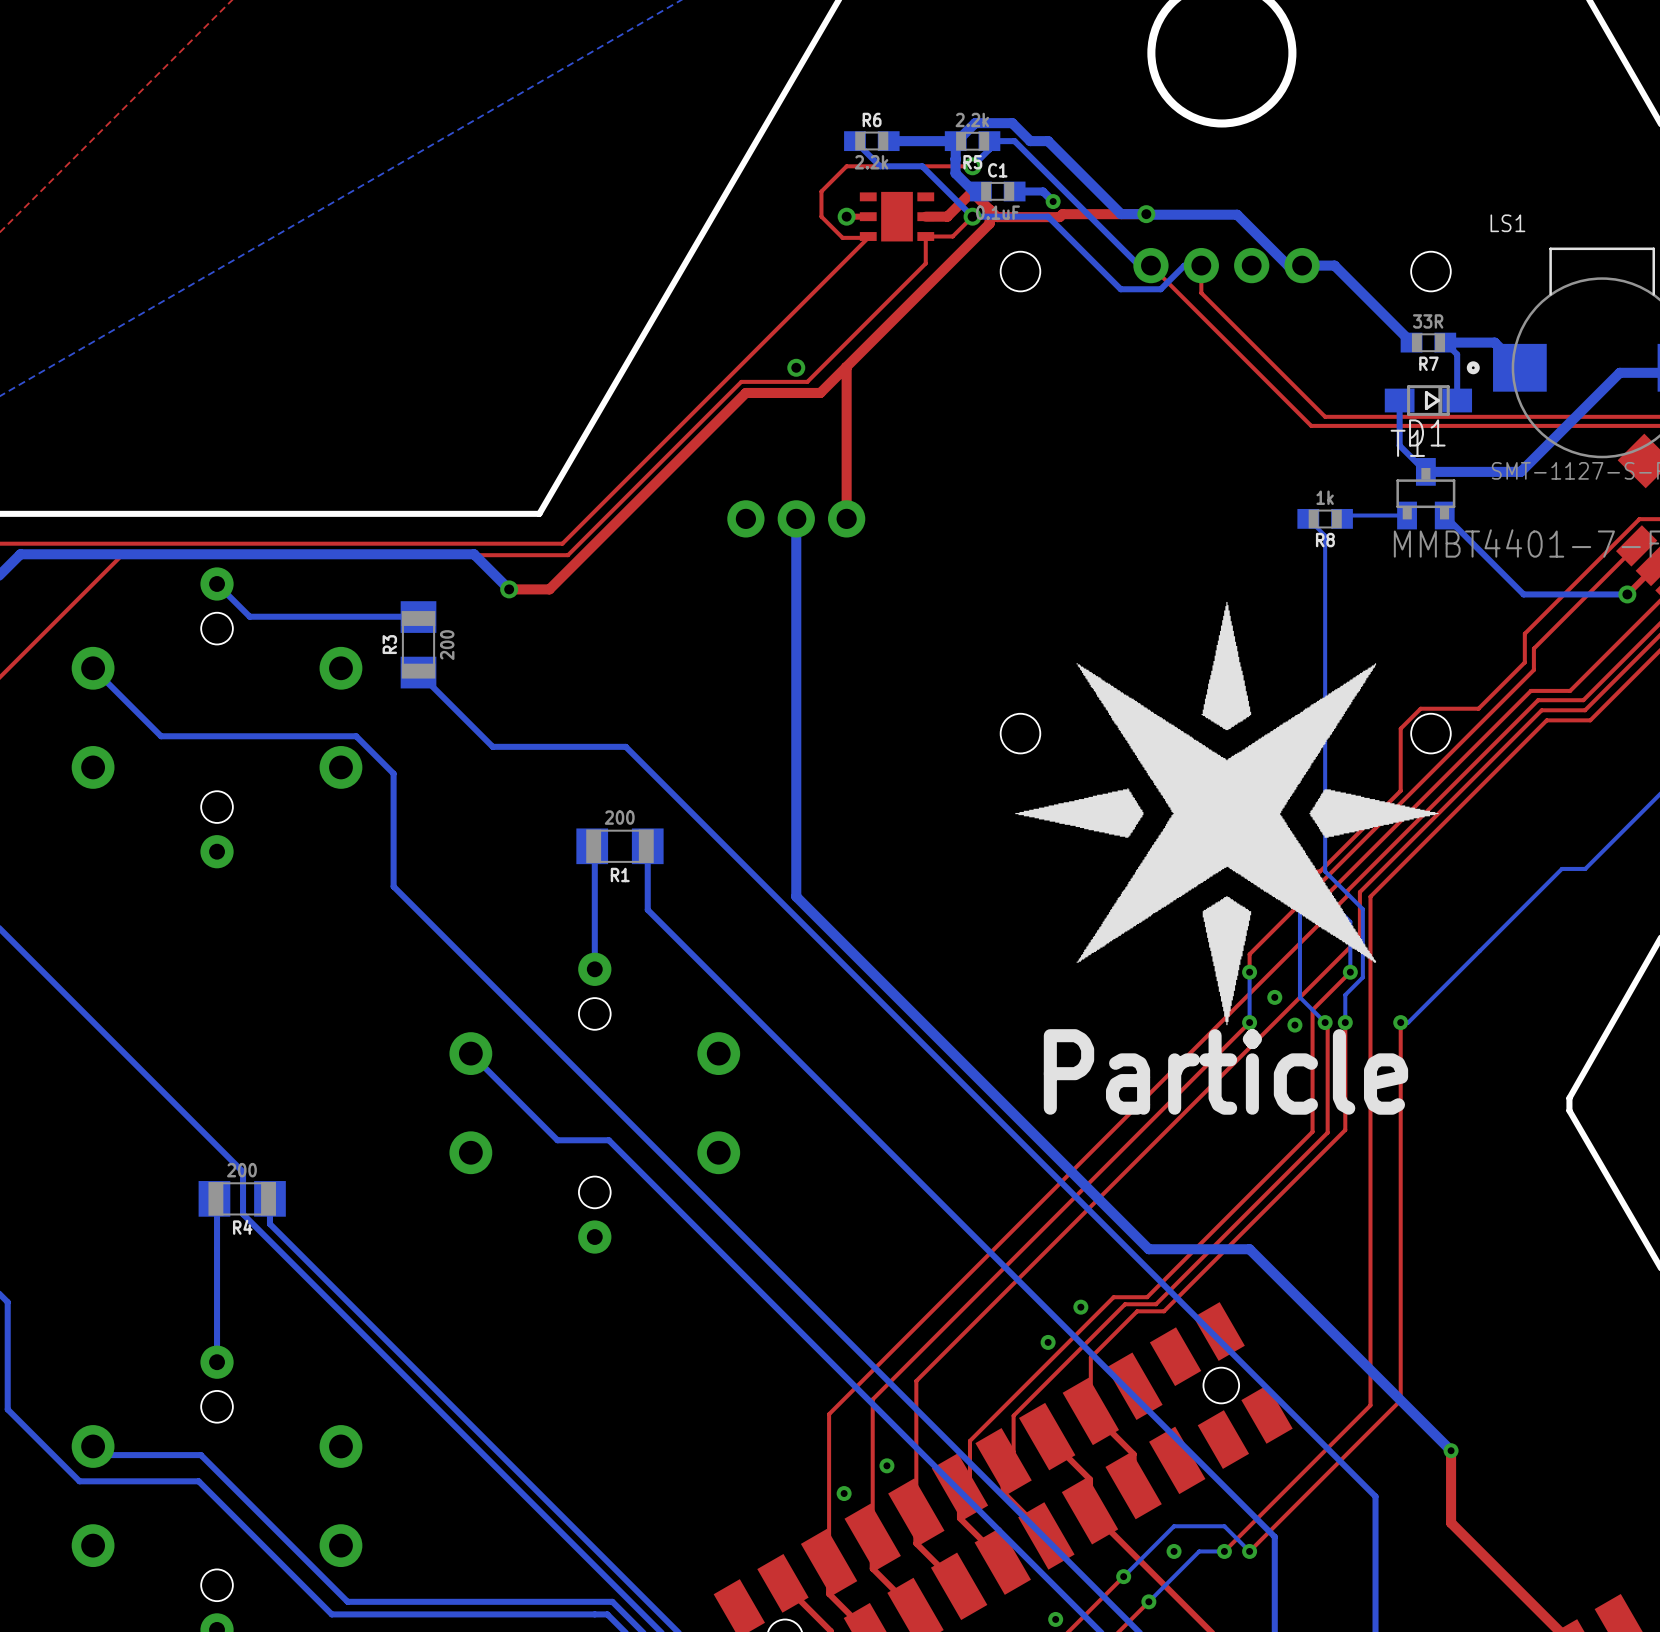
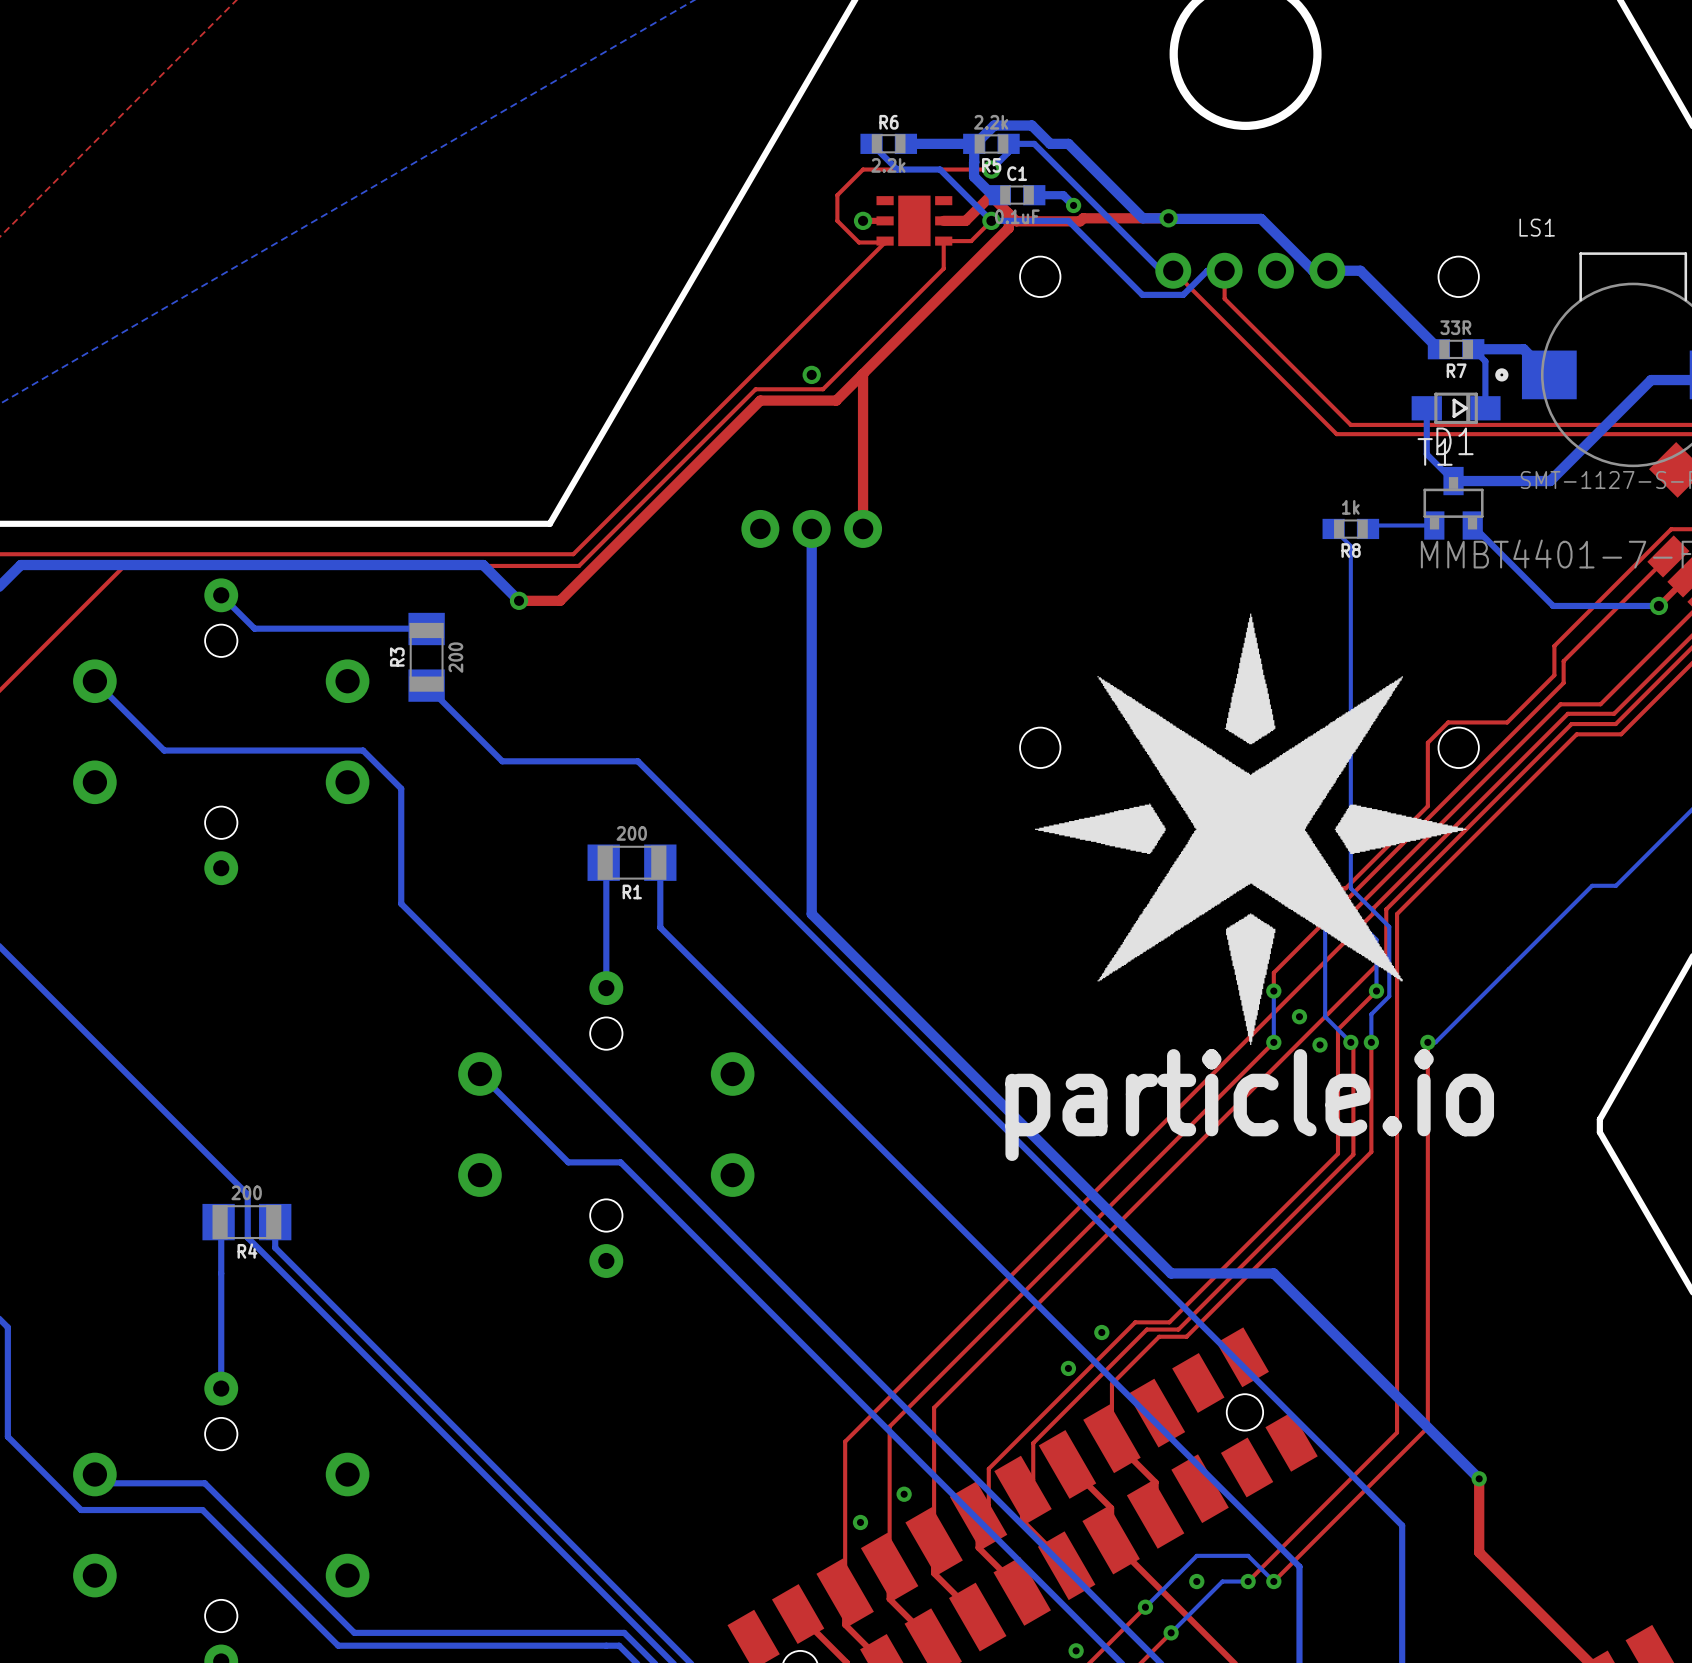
text: Particle (1225, 1071) -> particle.io (1249, 1105)

